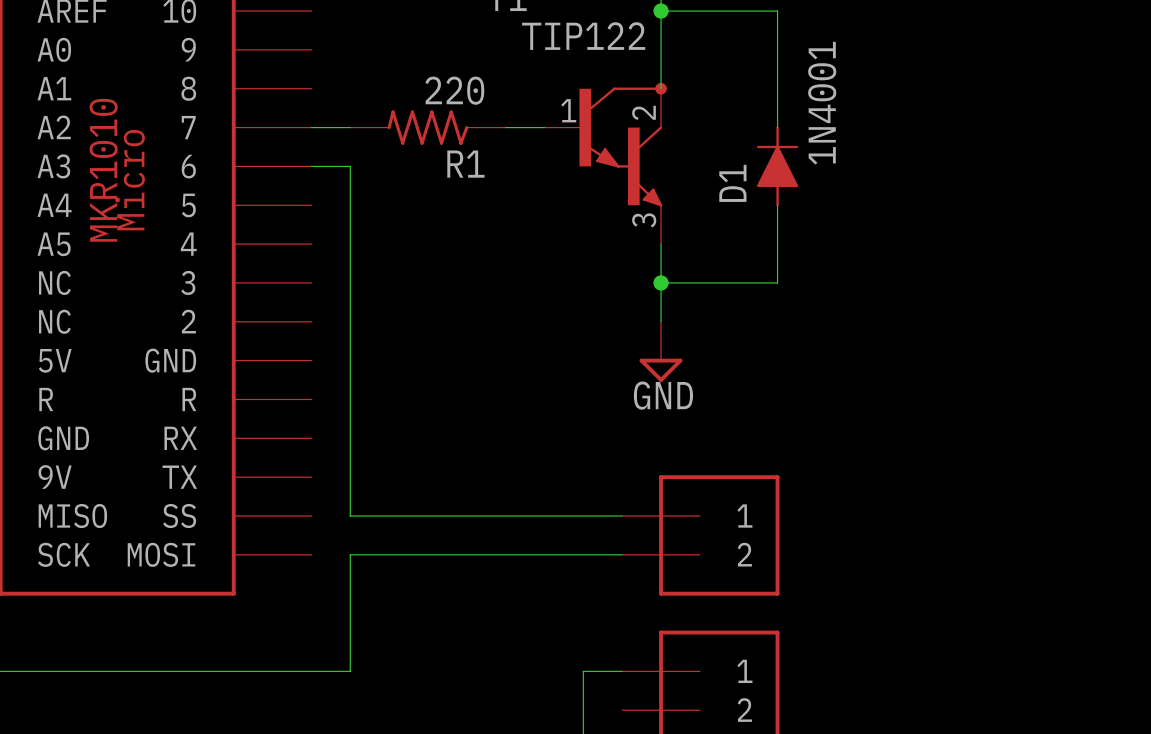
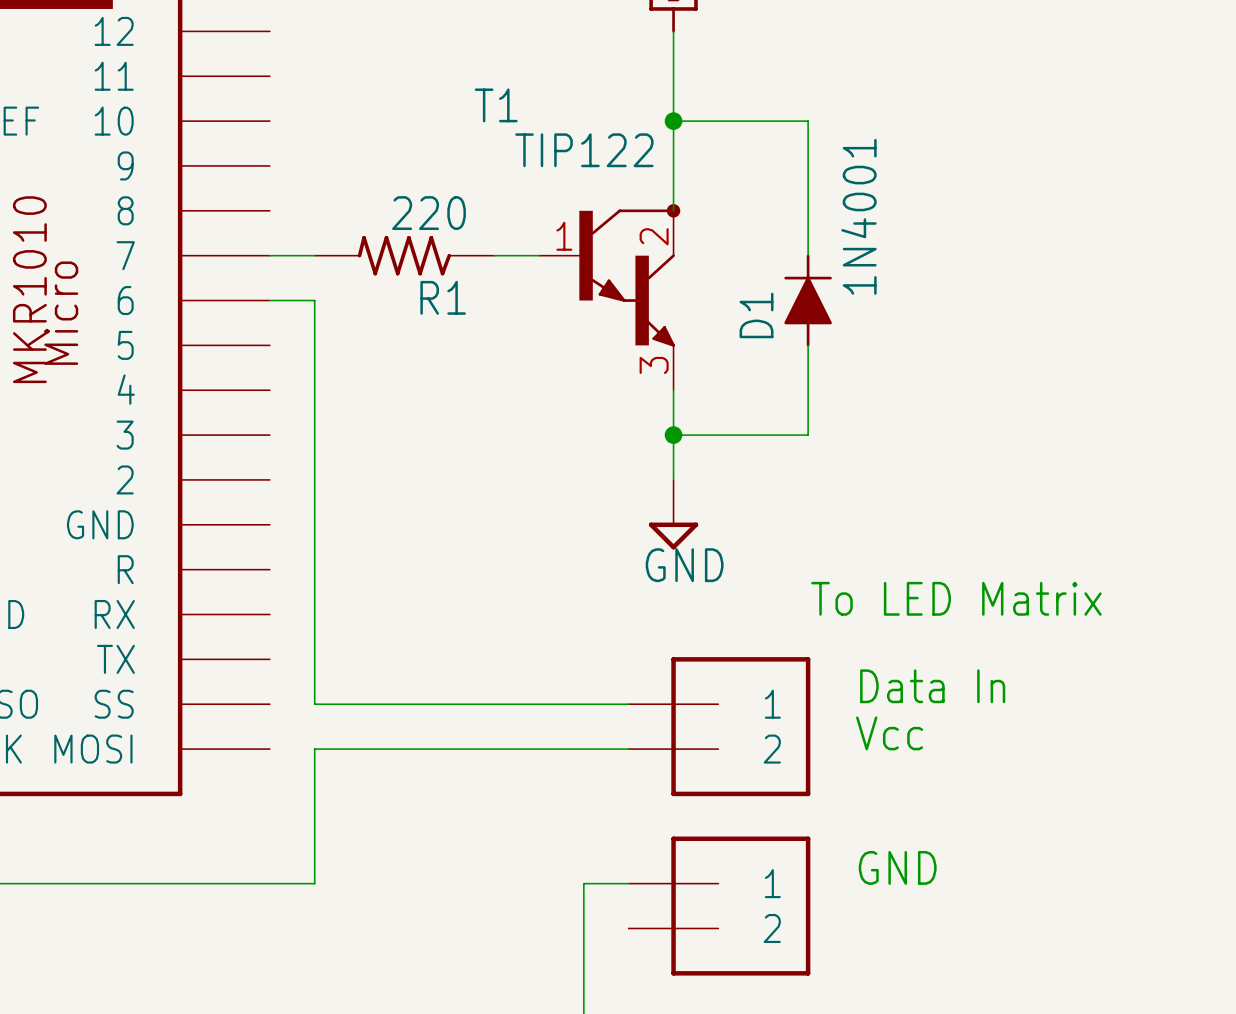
text: none -> To LED Matrix (956, 598)
text: none -> Data In (932, 686)
text: none -> Vcc (889, 733)
text: none -> GND (897, 867)

